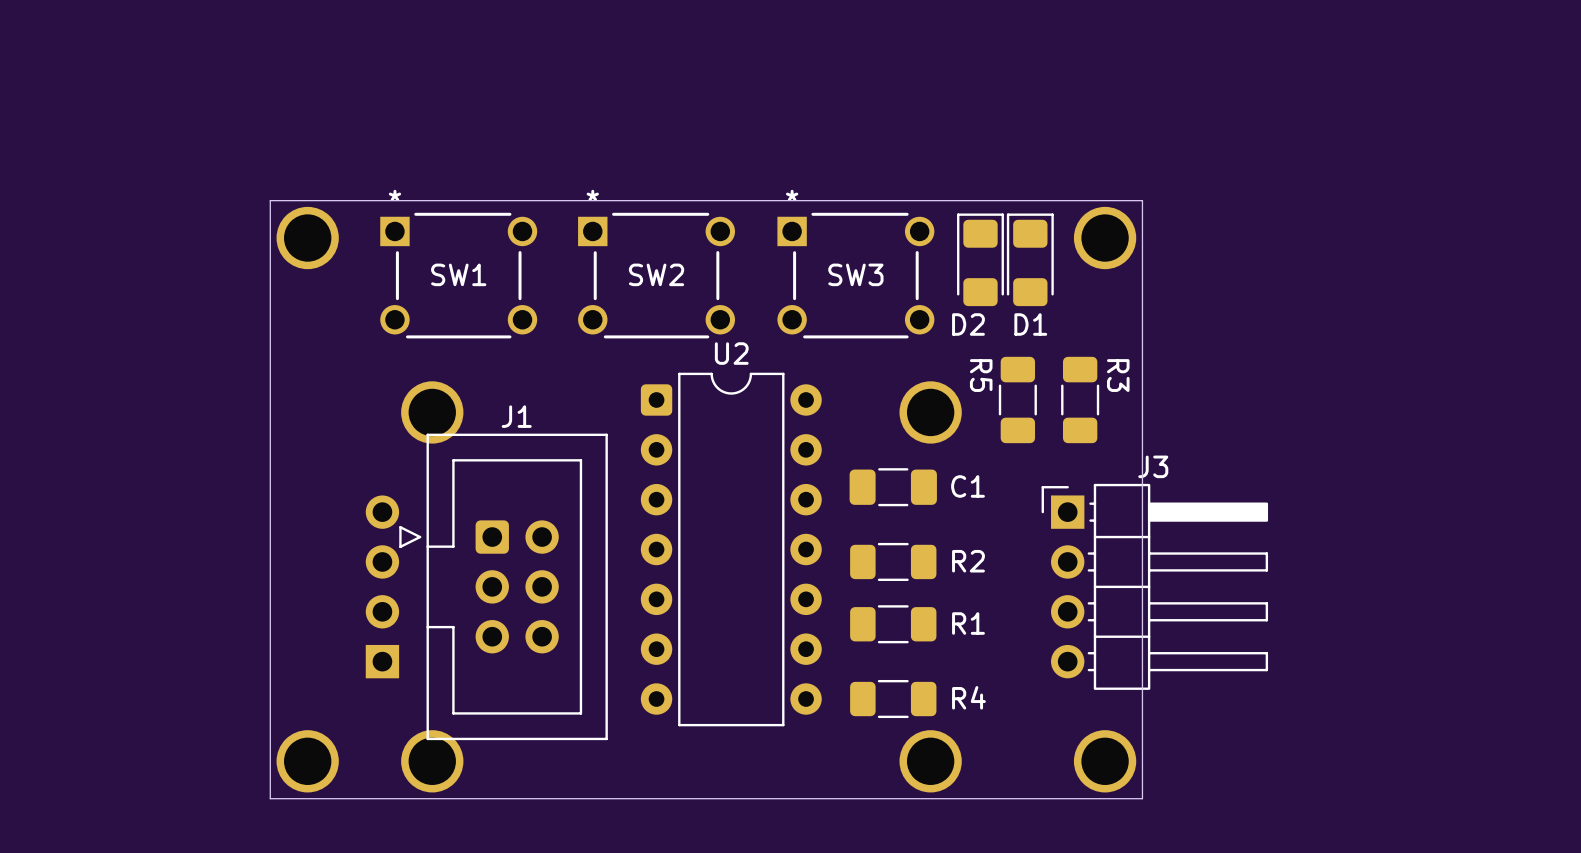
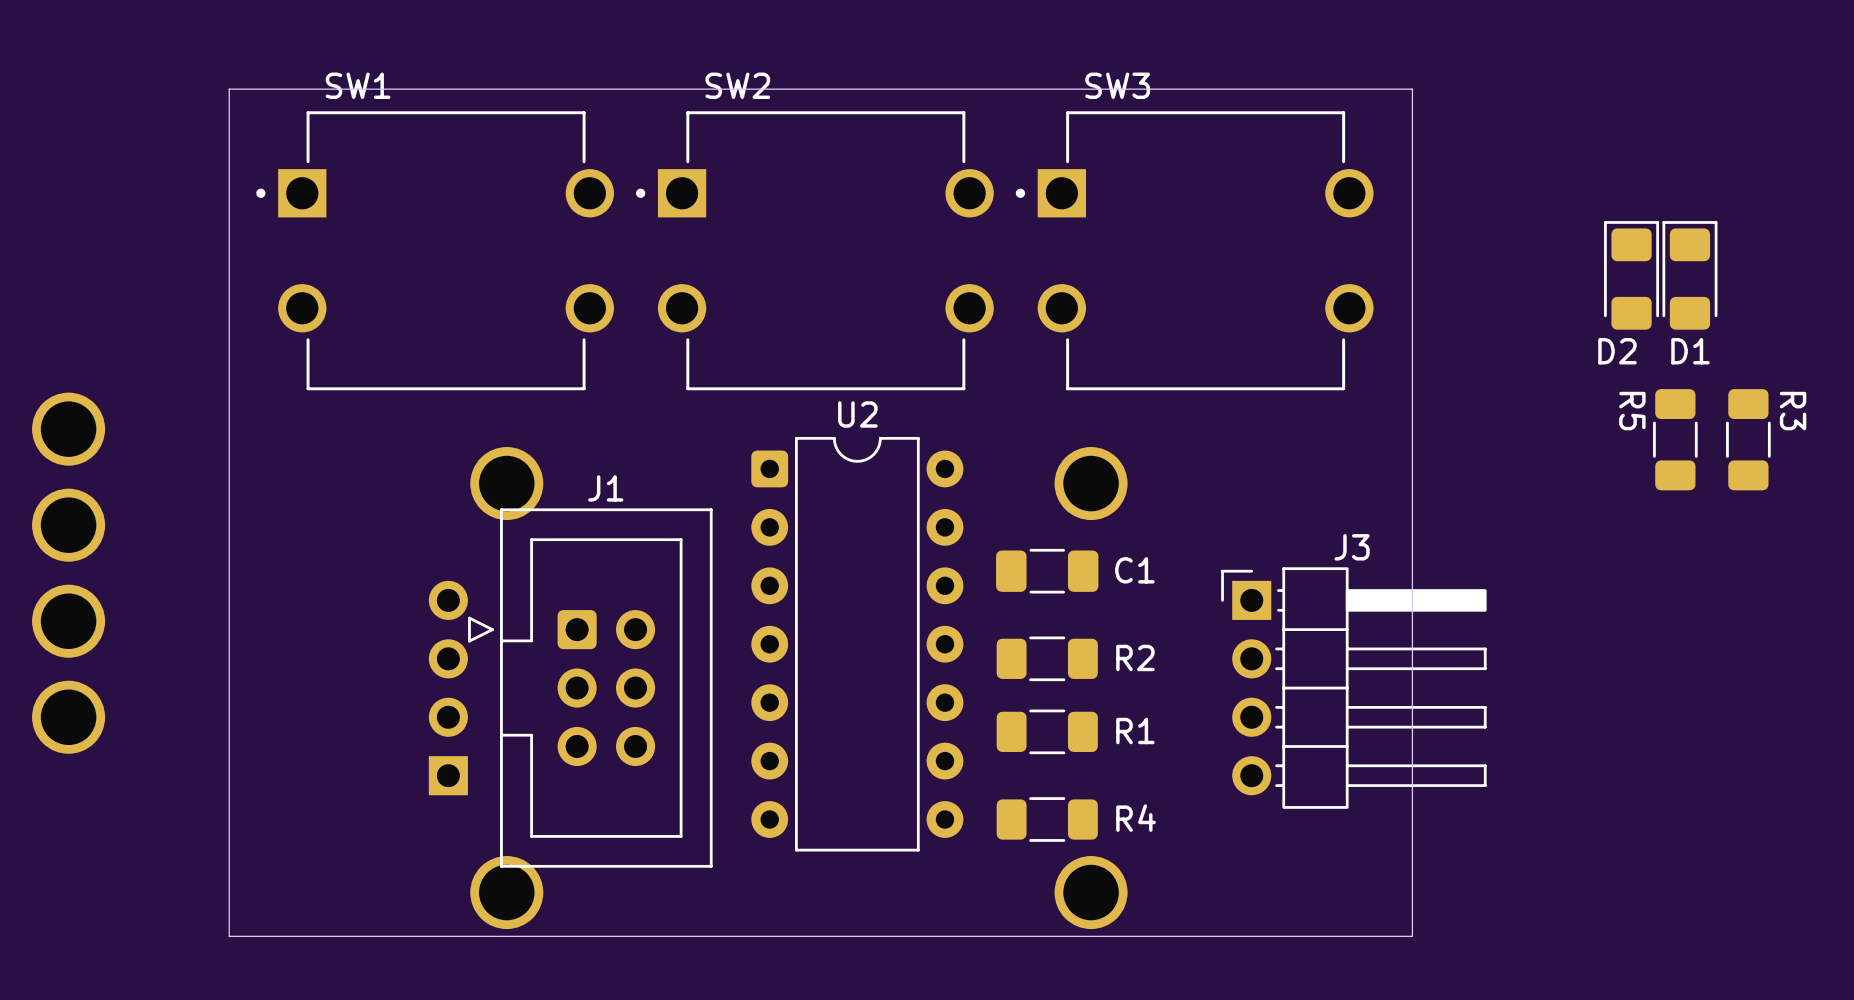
SW1 footprint: [380, 212, 538, 339] -> [256, 111, 614, 391]
SW2 footprint: [578, 212, 736, 339] -> [636, 111, 994, 391]
SW3 footprint: [777, 212, 935, 339] -> [1015, 111, 1374, 391]
part: (307, 238) -> none
part: (1105, 238) -> none
D2 position: (980, 259) -> (1631, 275)
D1 position: (1030, 259) -> (1689, 275)
SW1 name position: SW1 (458, 274) -> SW1 (358, 85)
SW2 name position: SW2 (656, 274) -> SW2 (737, 85)
SW3 name position: SW3 (855, 274) -> SW3 (1117, 85)
part: none -> (68, 429)
R5 position: (1017, 399) -> (1675, 439)
R3 position: (1080, 399) -> (1748, 439)
part: none -> (68, 525)
part: none -> (68, 621)
part: none -> (68, 717)
part: (307, 761) -> none
part: (1105, 761) -> none
board edge: (1142, 798) (1142, 200) (270, 200) (270, 798) -> (1339, 936) (1412, 936) (1412, 89) (229, 89) (229, 936) (316, 936)

